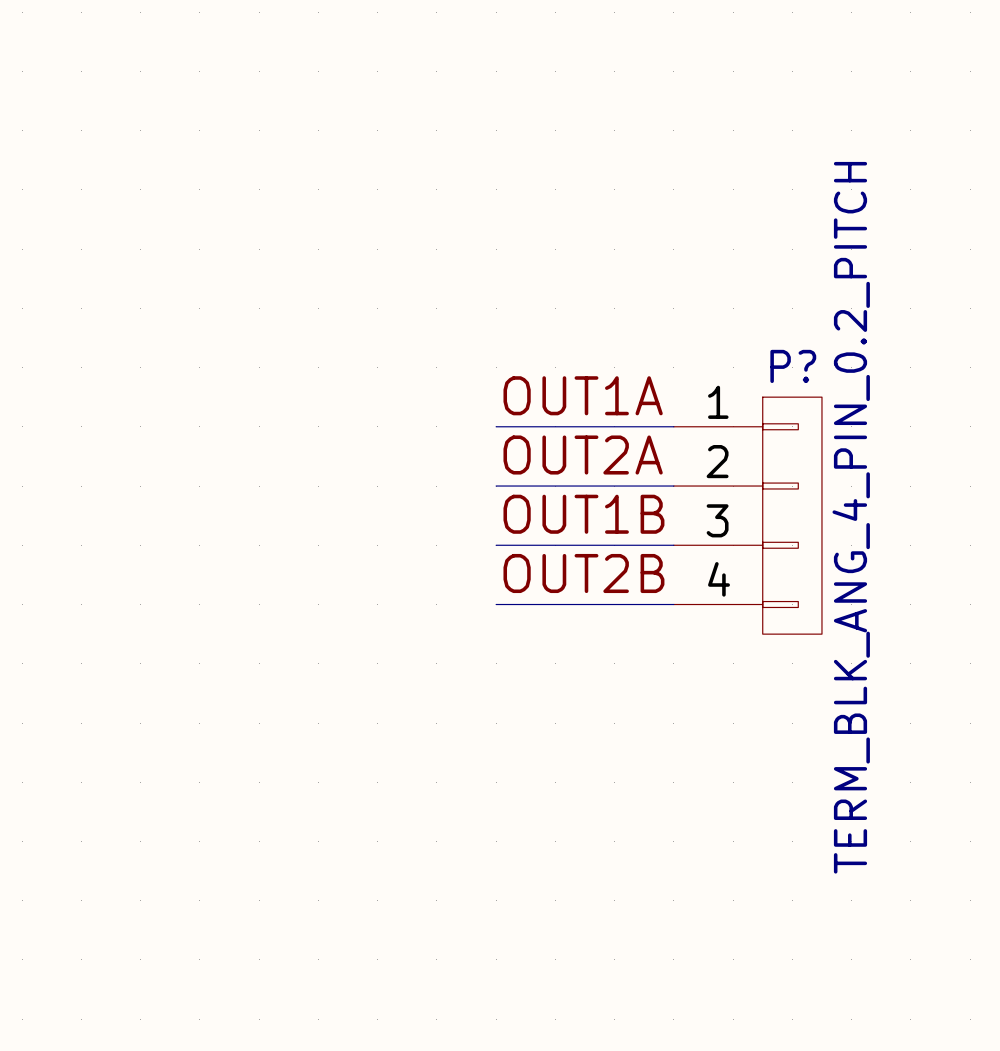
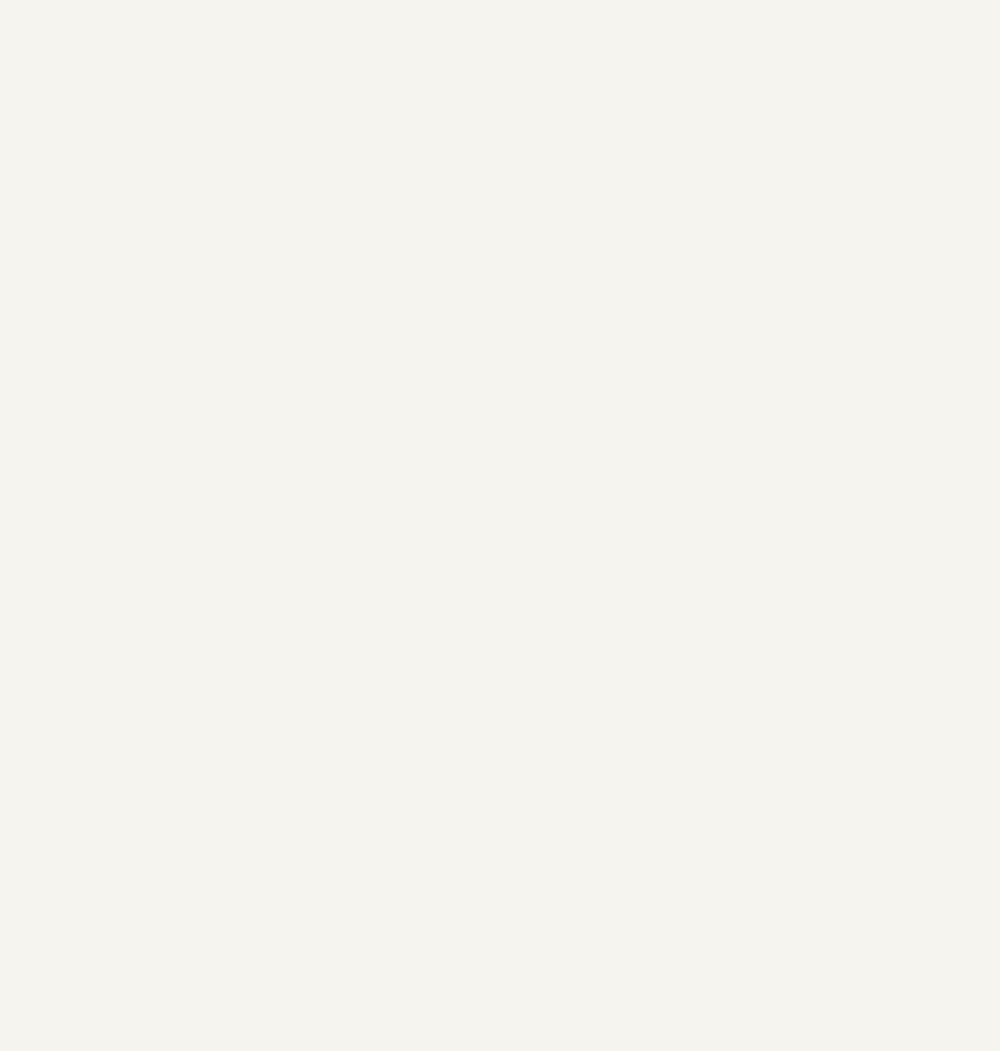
label: OUT1A (583, 395) -> none
wire: (496, 426) (673, 426) -> none
label: OUT2A (583, 455) -> none
wire: (496, 486) (673, 486) -> none
label: OUT1B (583, 514) -> none
P?: TERM_BLK_ANG_4_PIN_0.2_PITCH (747, 515) -> none
wire: (496, 545) (673, 545) -> none
label: OUT2B (583, 573) -> none
wire: (496, 604) (673, 604) -> none

